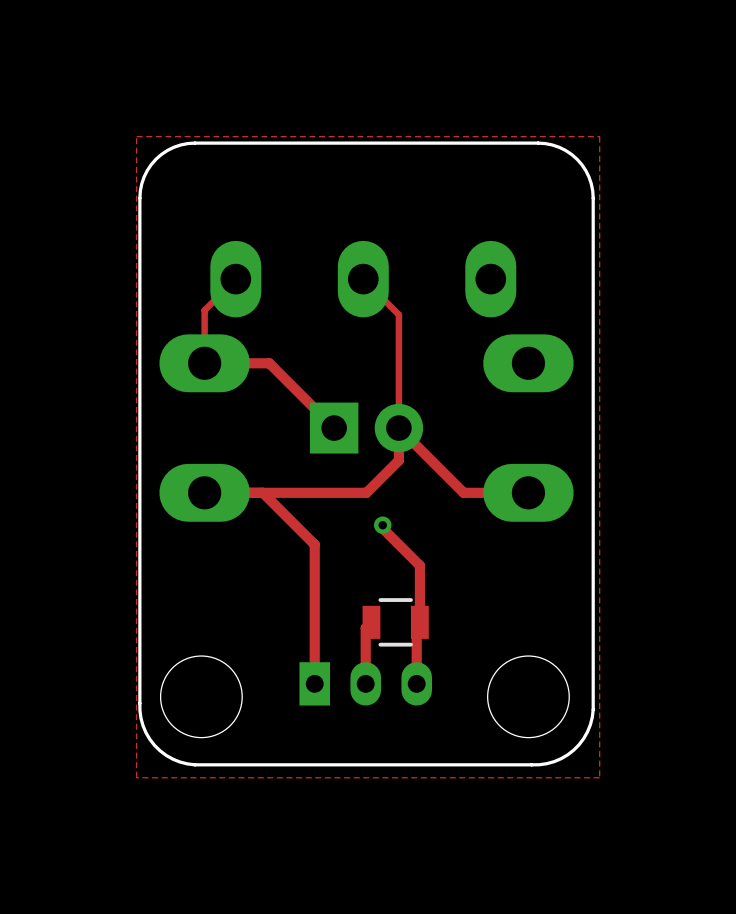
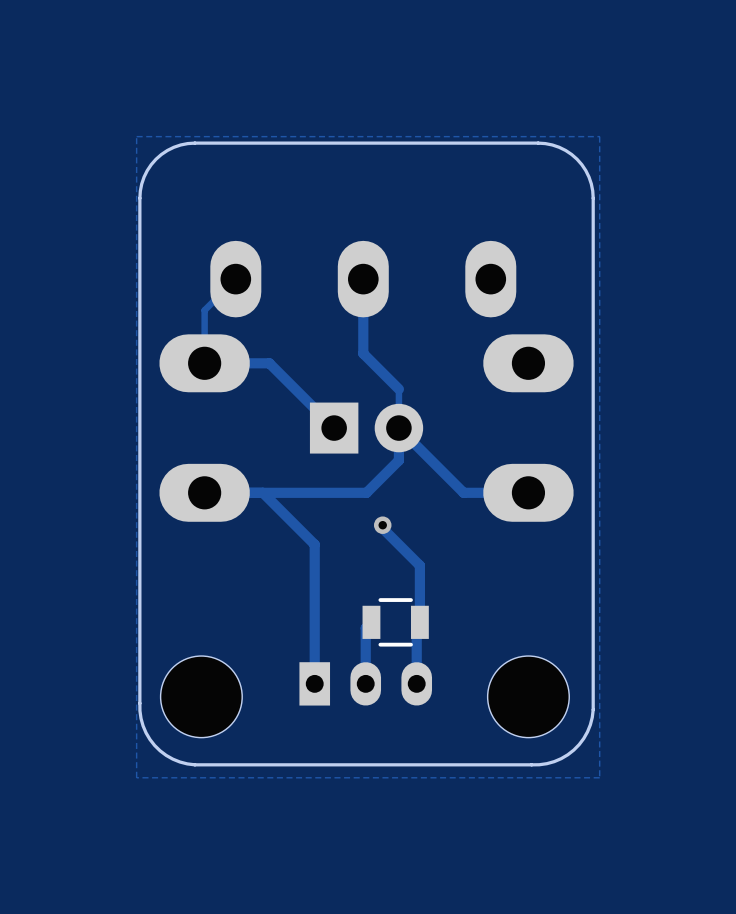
track: (363, 279) (398, 314) (398, 389) -> (363, 279) (363, 353) (398, 389)

